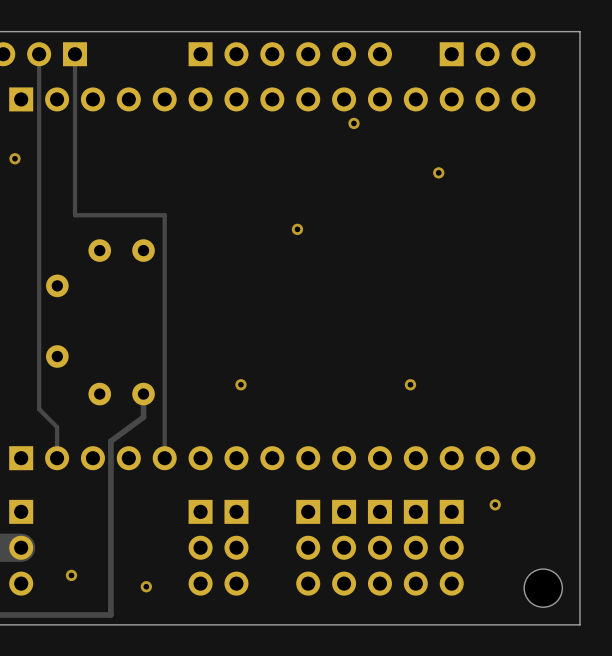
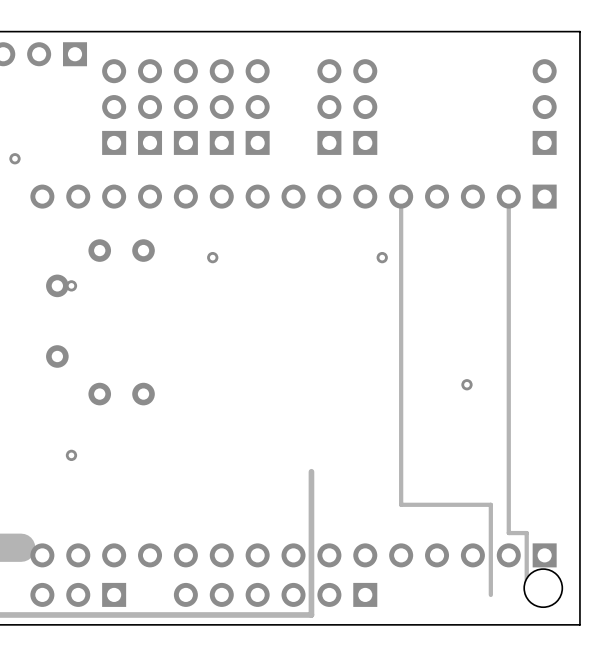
track: (39, 54) (39, 409) (57, 427) (57, 458) -> none
track: (75, 54) (75, 215) (164, 215) (164, 458) -> none
part: (290, 54) -> none
part: (487, 54) -> none
part rotation: 0° (272, 99) -> 180° (293, 196)
part: none -> (114, 107)
part: none -> (150, 107)
part: none -> (185, 107)
part: none -> (221, 107)
part: none -> (257, 107)
part: none -> (329, 107)
part: none -> (365, 107)
part: none -> (544, 107)
via: (353, 123) -> none
via: (438, 172) -> none
track: none -> (401, 196) (401, 504) (490, 504) (490, 594)
track: none -> (508, 196) (508, 533) (526, 533) (526, 594)
via: (297, 229) -> none
via: none -> (212, 257)
via: none -> (382, 257)
via: none -> (71, 285)
via: (240, 384) -> none
via position: (410, 384) -> (466, 384)
track: (143, 394) (143, 417) (110, 441) (110, 614) -> (311, 471) (311, 614) (110, 614)
via: none -> (71, 455)
part rotation: 0° (272, 458) -> 180° (293, 555)
via: (495, 504) -> none
part: (21, 547) -> none
part: (200, 547) -> none
part: (236, 547) -> none
part: (308, 547) -> none
part: (344, 547) -> none
part: (379, 547) -> none
part: (415, 547) -> none
part: (451, 547) -> none
via: (71, 575) -> none
via: (146, 586) -> none
part: none -> (78, 594)
part: none -> (275, 594)

